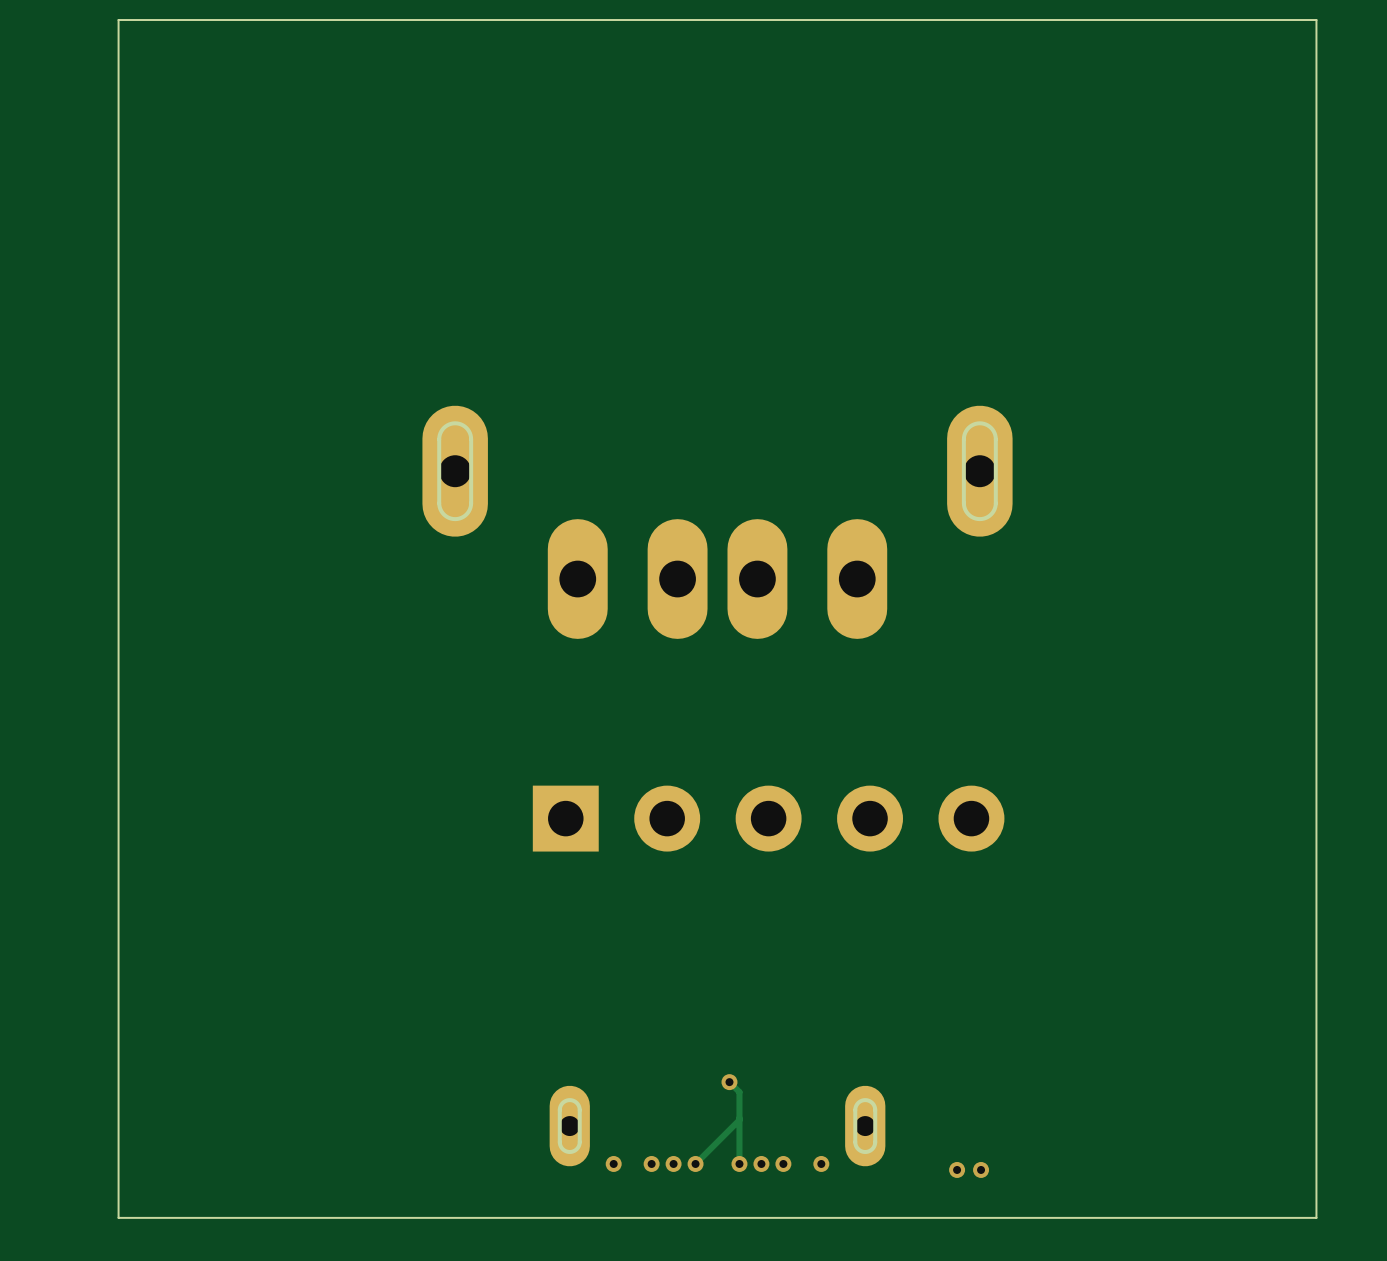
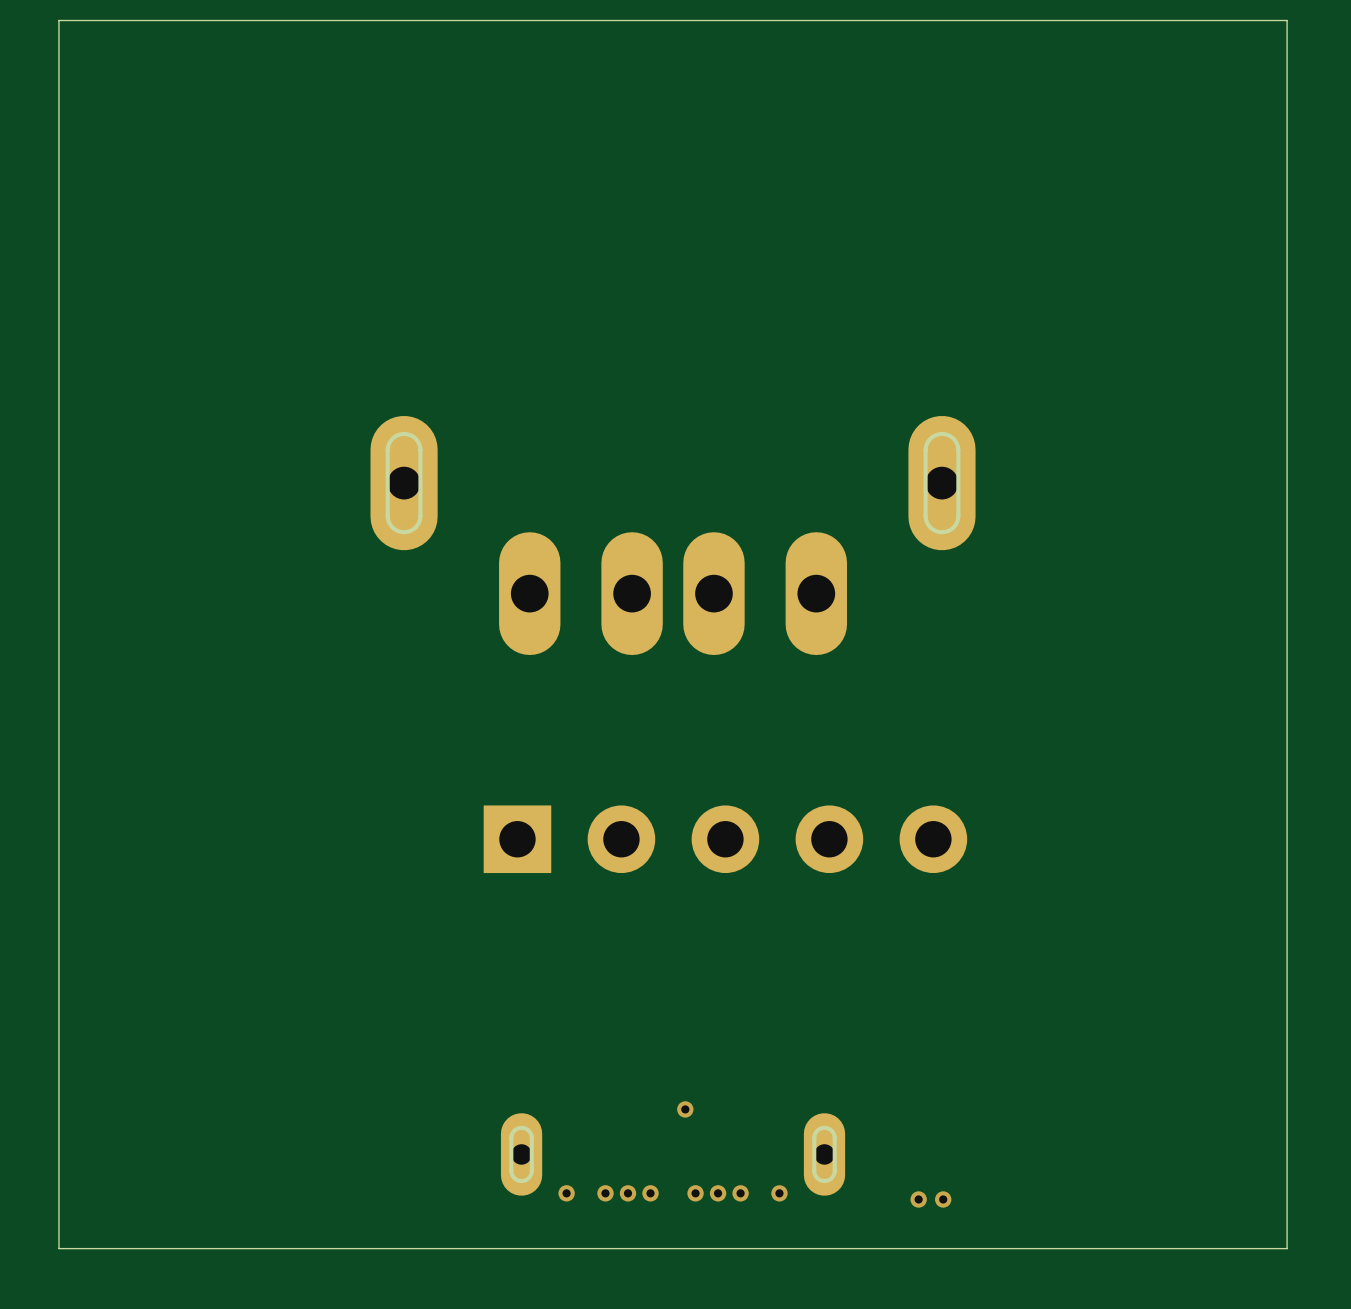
track: (729, 1082) (739, 1092) (739, 1163) -> none
track: (739, 1120) (695, 1163) -> none

